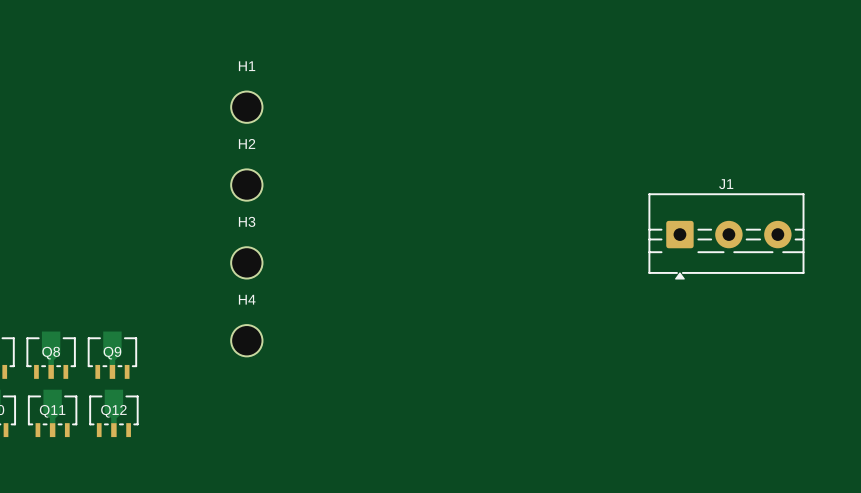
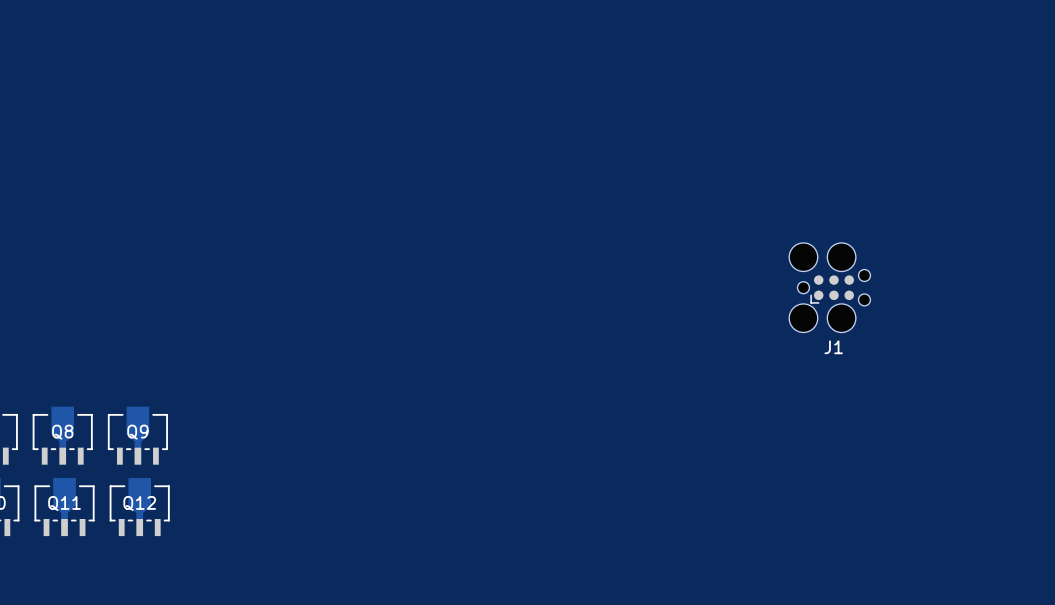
H1: (246, 107) -> none
J1 name position: J1 (726, 184) -> J1 (833, 347)
H2: (246, 185) -> none
J1 footprint: [648, 193, 805, 280] -> [789, 242, 871, 333]
H3: (246, 262) -> none
H4: (246, 340) -> none

